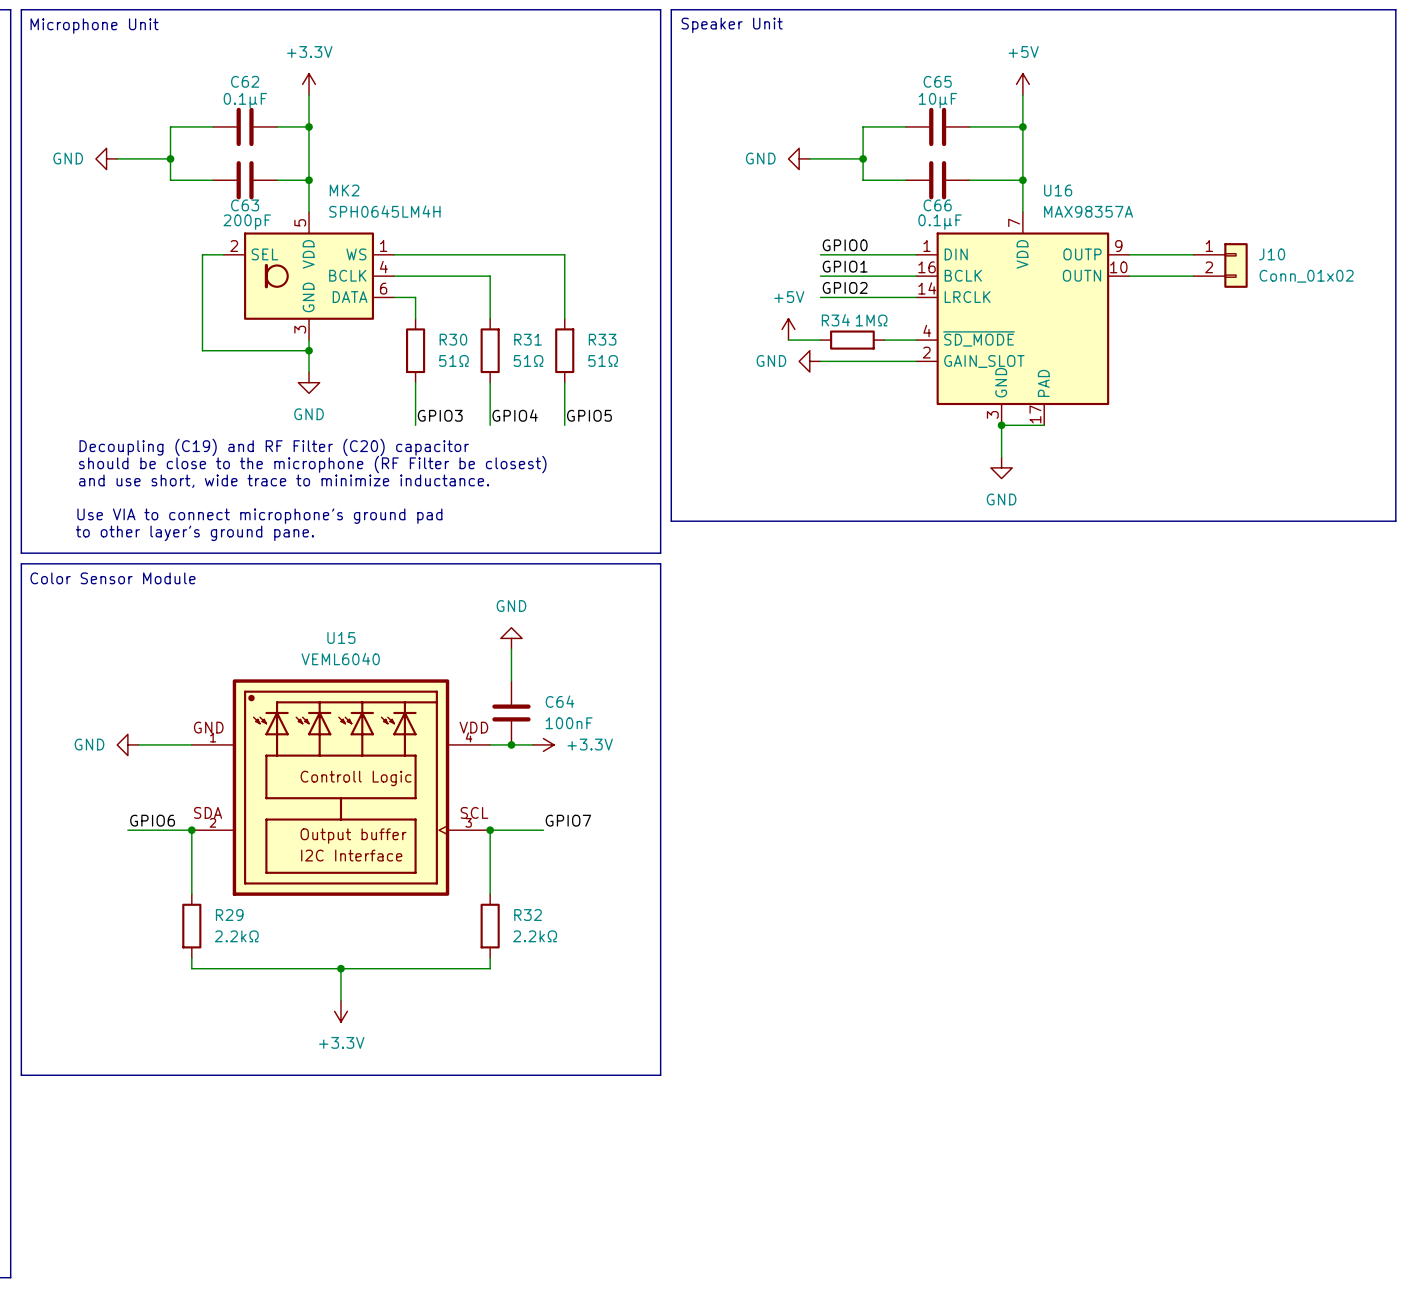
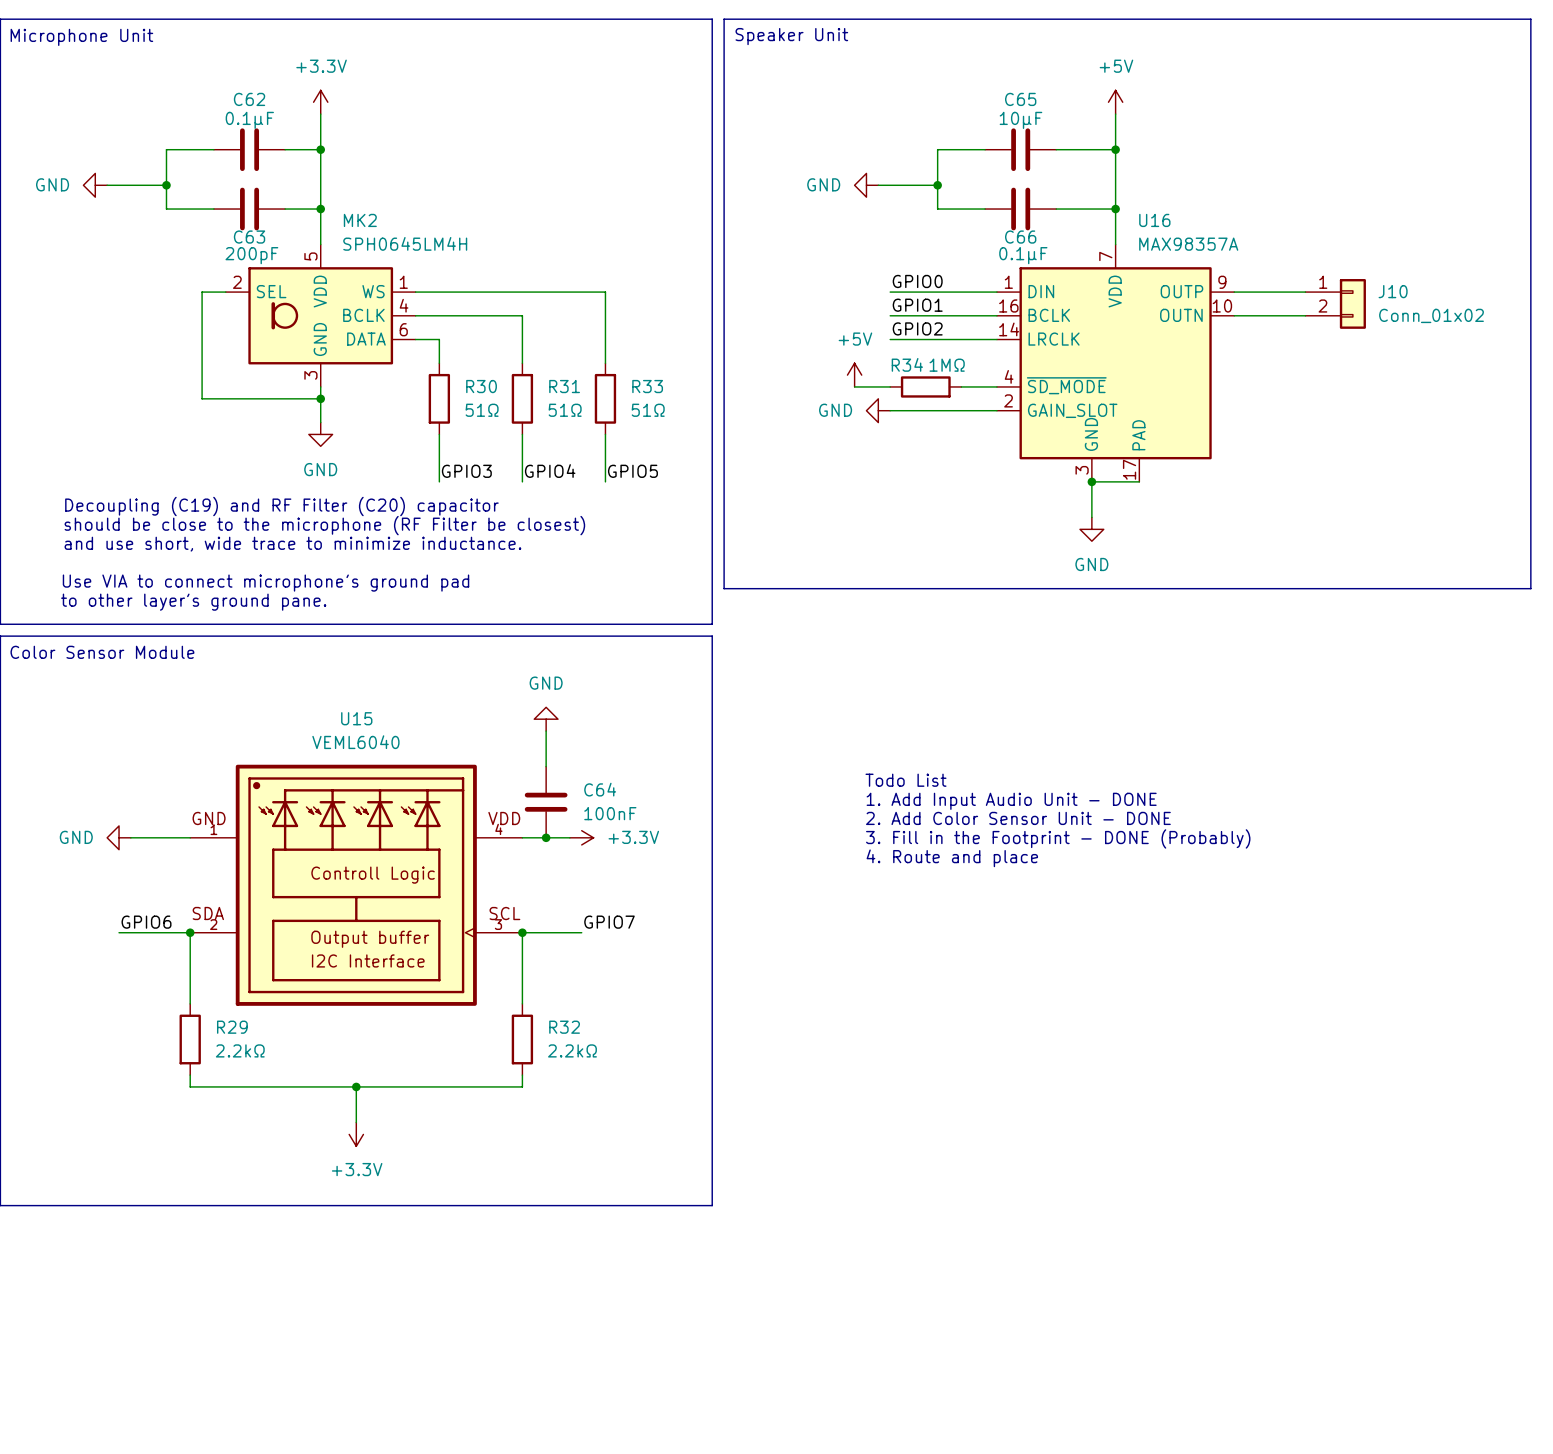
text: none -> Todo List (905, 780)
text: none -> 1. Add Input Audio Unit - DONE (1011, 801)
text: none -> 2. Add Color Sensor Unit - DONE (1018, 818)
text: none -> 3. Fill in the Footprint - DONE (Probably) (1058, 838)
text: none -> 4. Route and place (952, 858)

